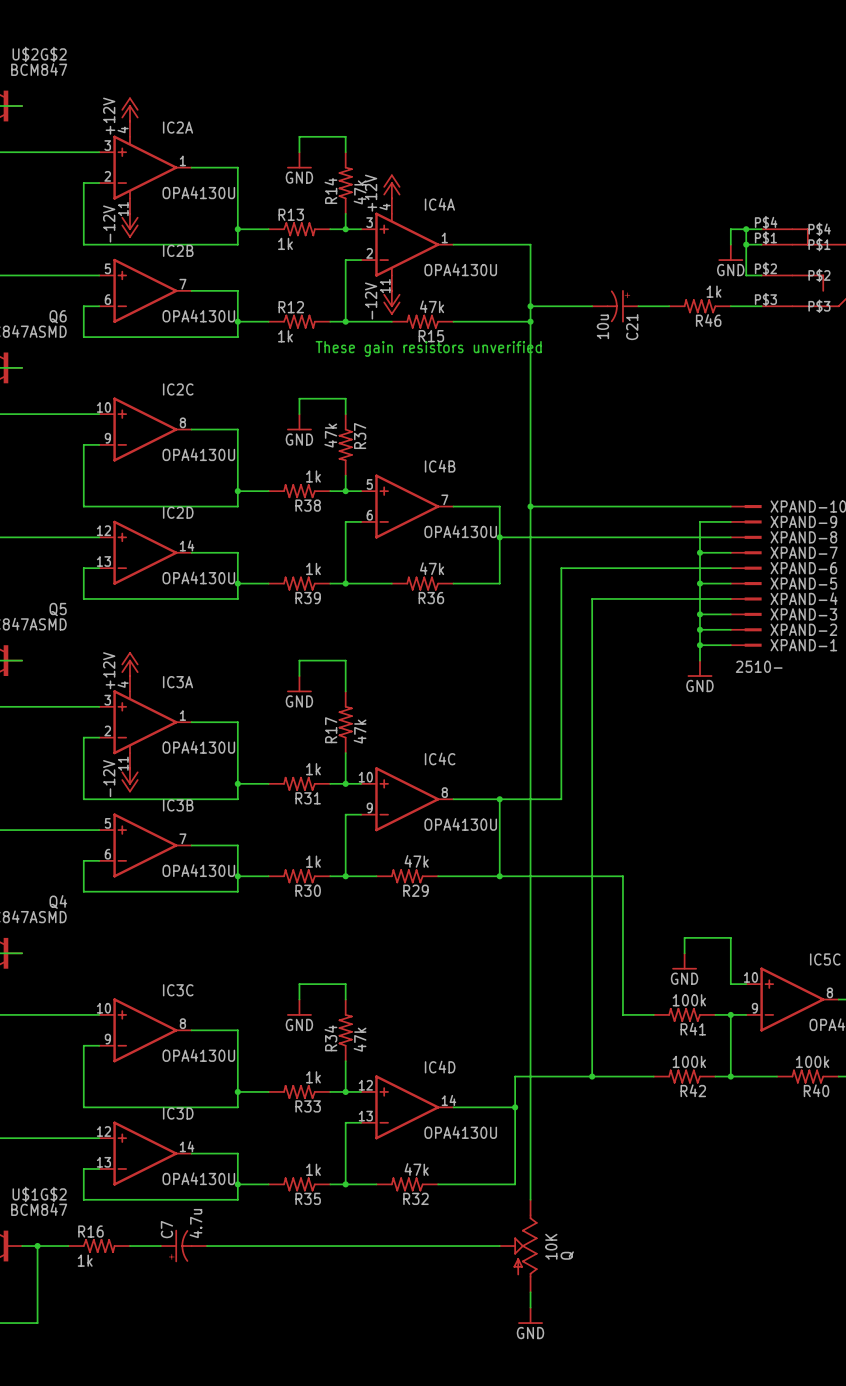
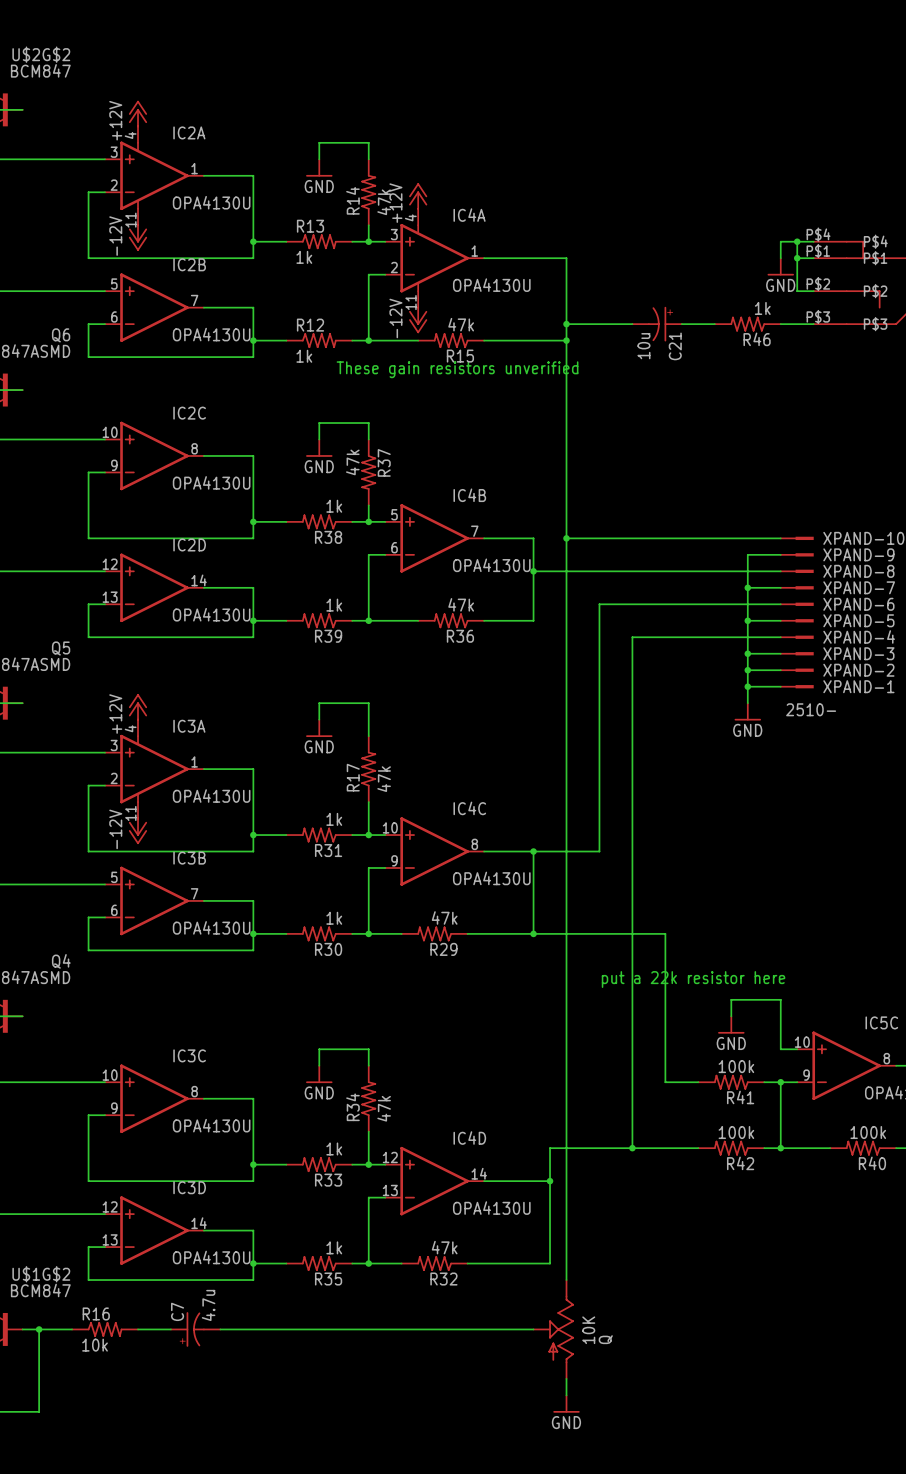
text: none -> put a 22k resistor here (693, 979)
R16 value: 1k (85, 1260) -> 10k (95, 1345)

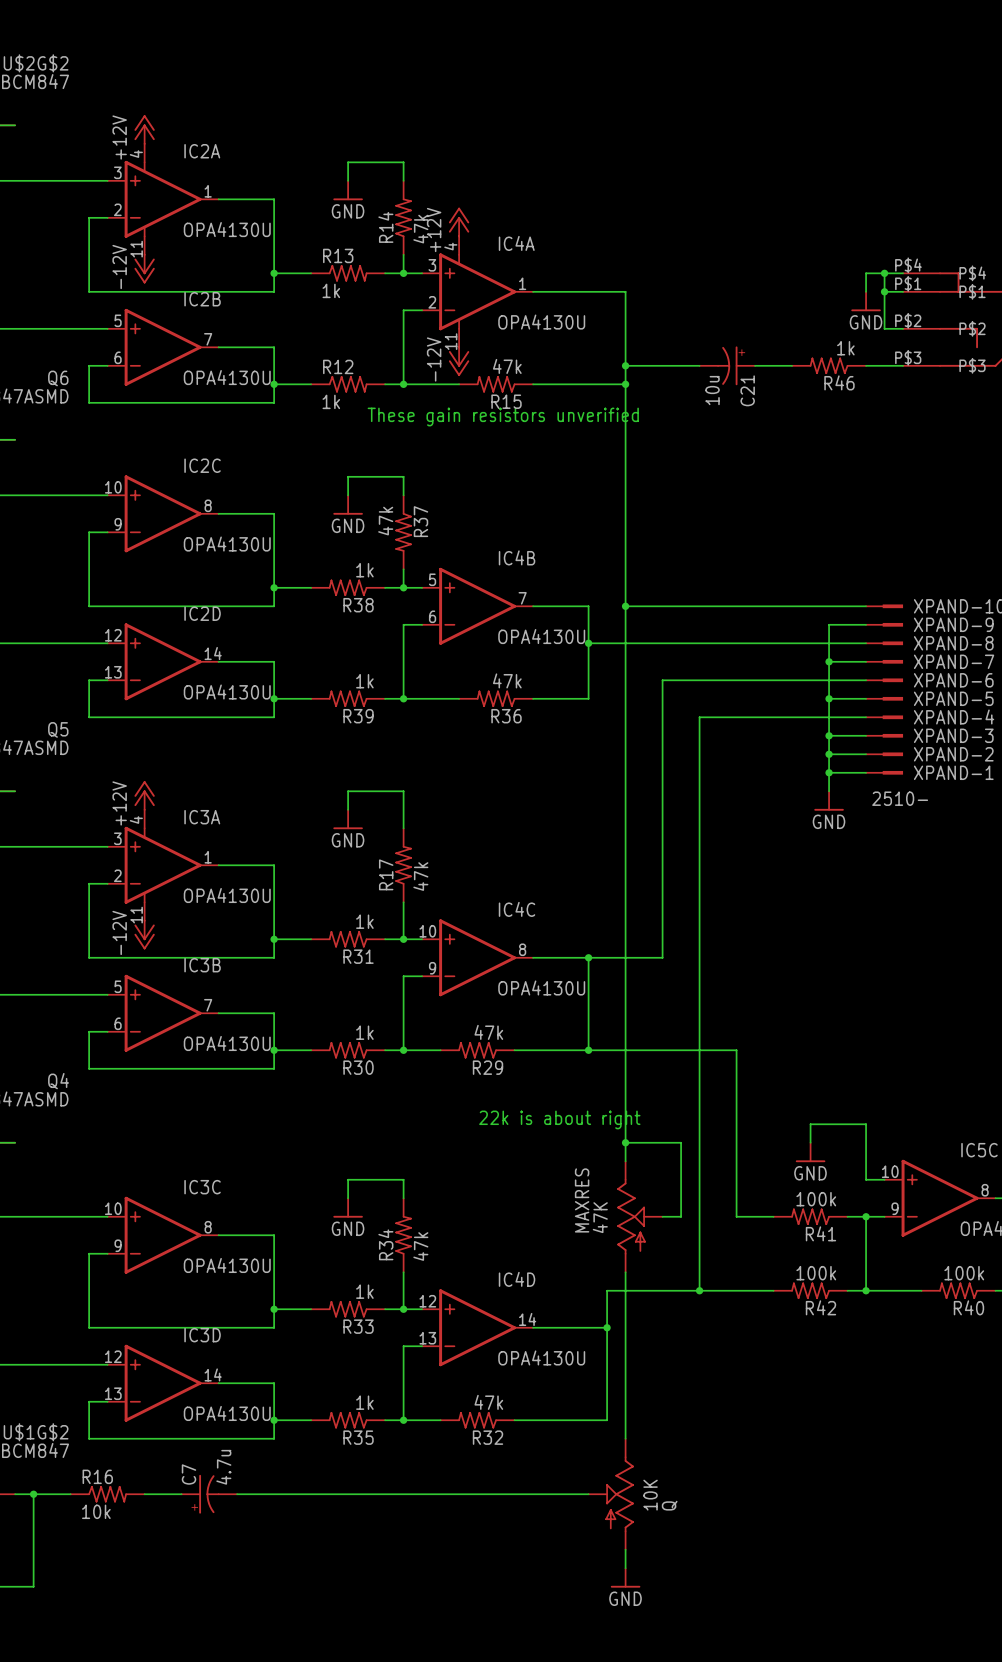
text: put a 22k resistor here (693, 979) -> none
text: none -> 22k is about right (559, 1119)
wire: none -> (625, 1142) (681, 1142) (681, 1216) (662, 1216)
junction: none -> (625, 1142)
MAXRES: none -> 47K (639, 1216)

